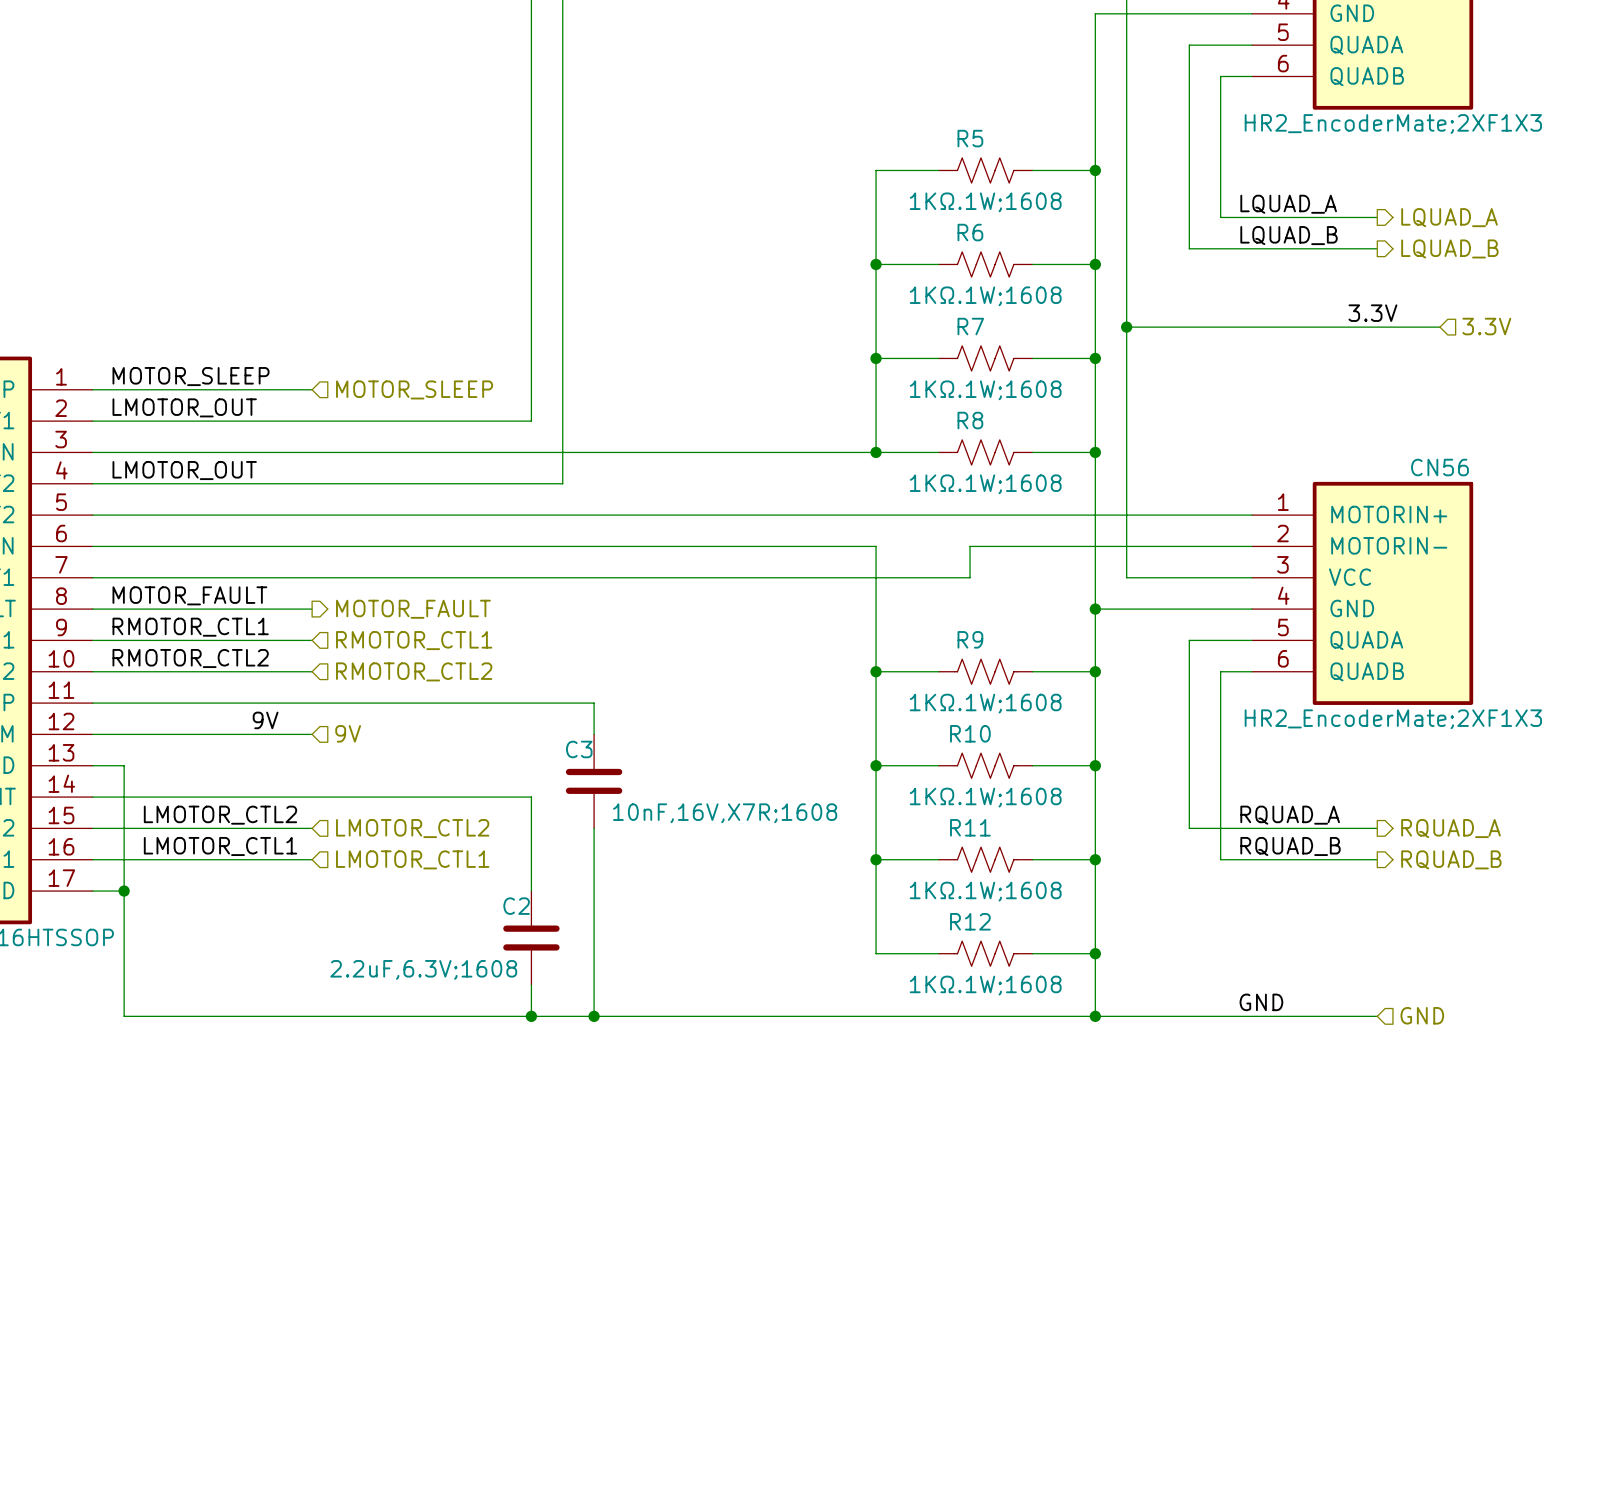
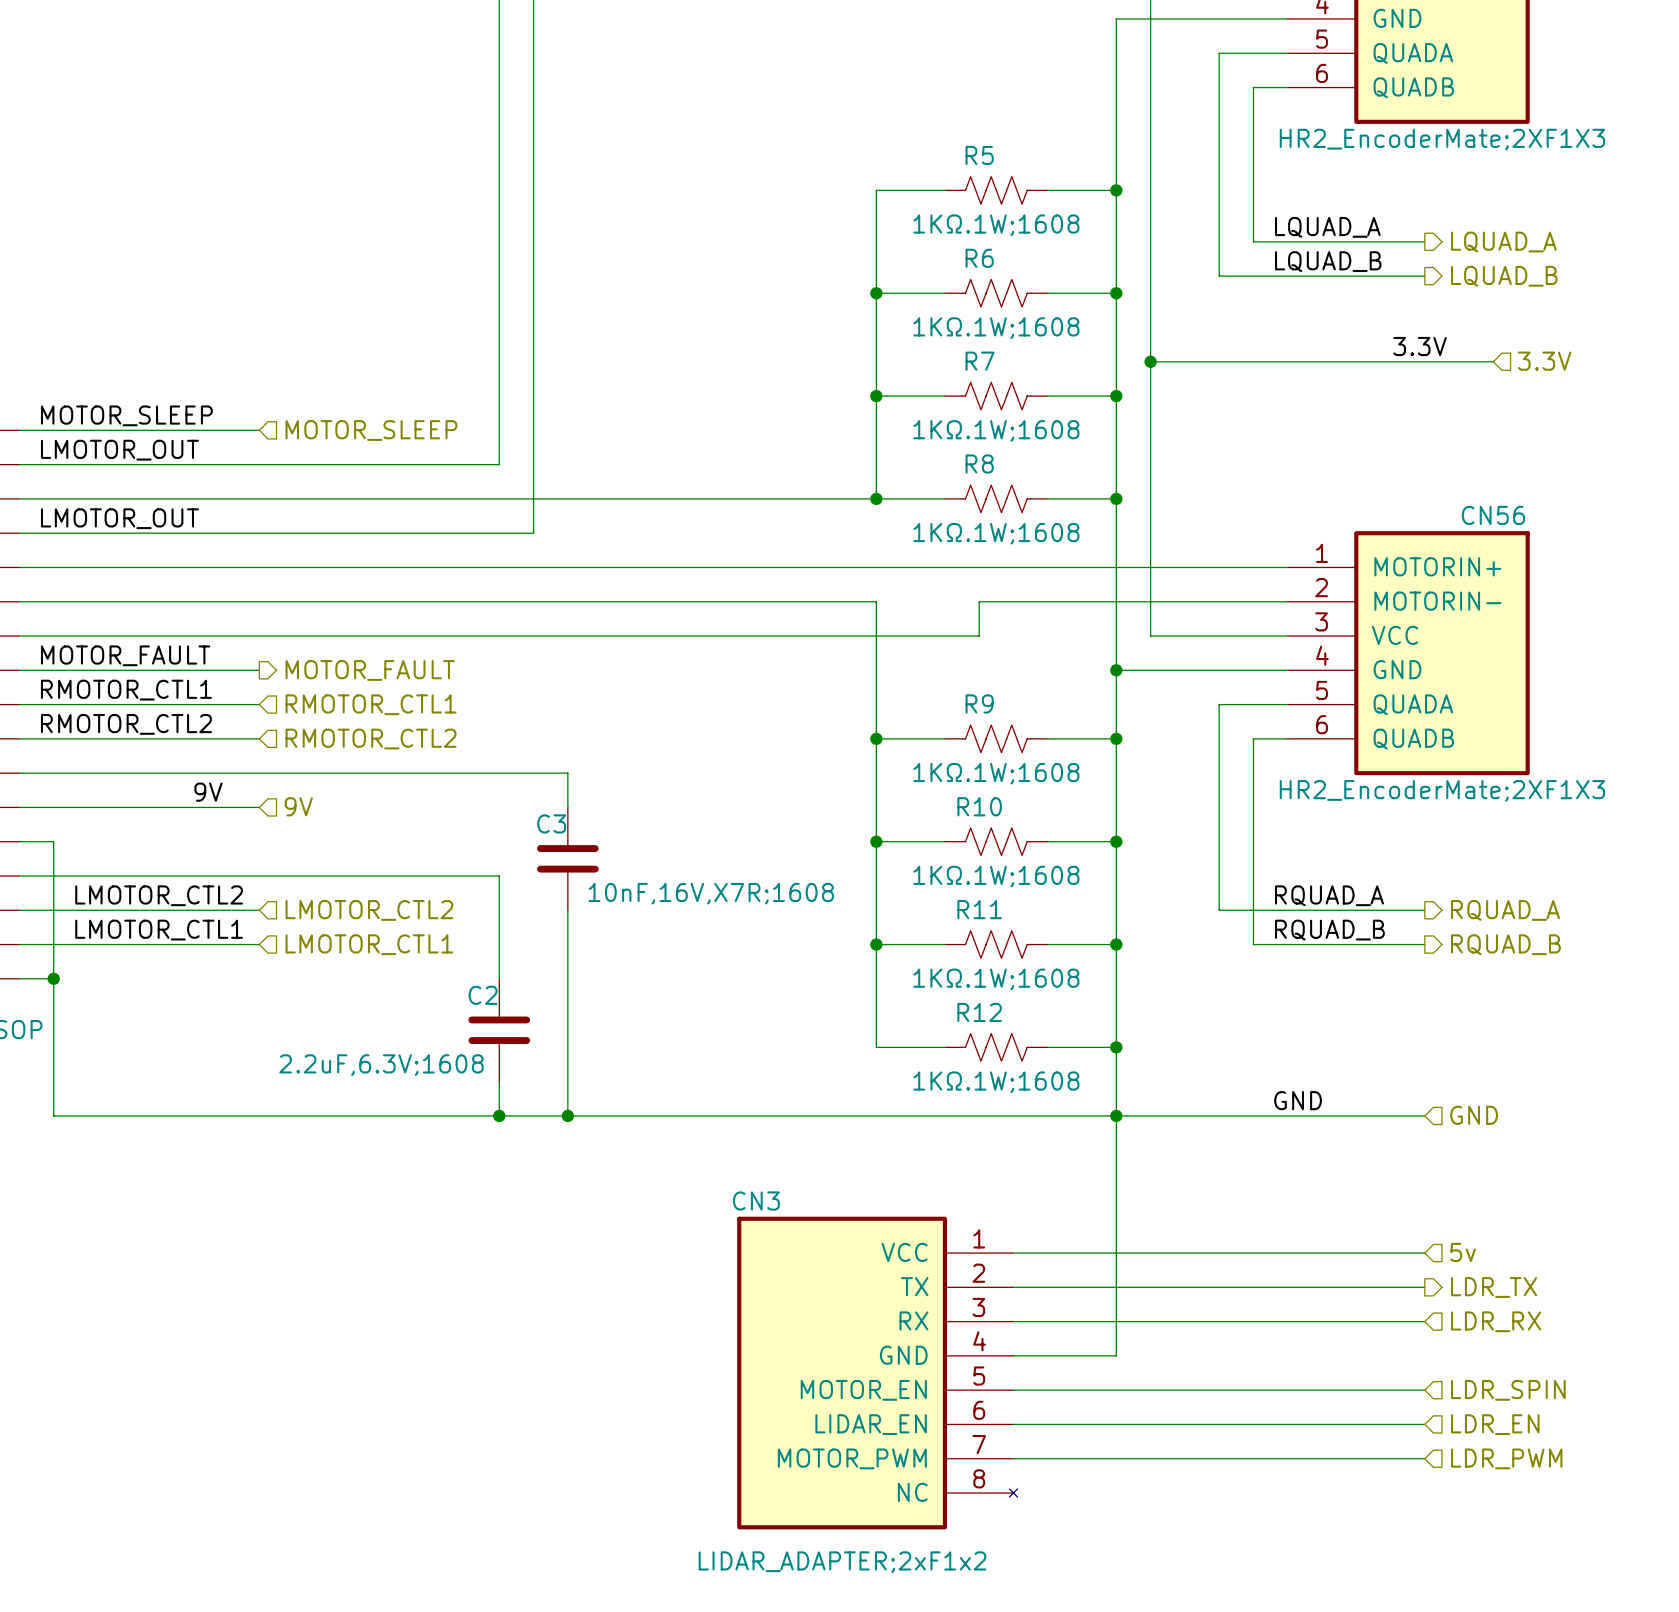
wire: none -> (1116, 1115) (1116, 1355) (1013, 1355)
wire: none -> (1013, 1253) (1424, 1253)
hierarchical label: none -> 5v (1463, 1252)
wire: none -> (1013, 1287) (1424, 1287)
hierarchical label: none -> LDR_TX (1494, 1287)
wire: none -> (1013, 1321) (1424, 1321)
hierarchical label: none -> LDR_RX (1496, 1321)
CN3: none -> LIDAR_ADAPTER;2xF1x2 (877, 1373)
wire: none -> (1013, 1390) (1424, 1390)
hierarchical label: none -> LDR_SPIN (1508, 1390)
wire: none -> (1013, 1424) (1424, 1424)
hierarchical label: none -> LDR_EN (1495, 1424)
wire: none -> (1013, 1458) (1424, 1458)
hierarchical label: none -> LDR_PWM (1506, 1458)

